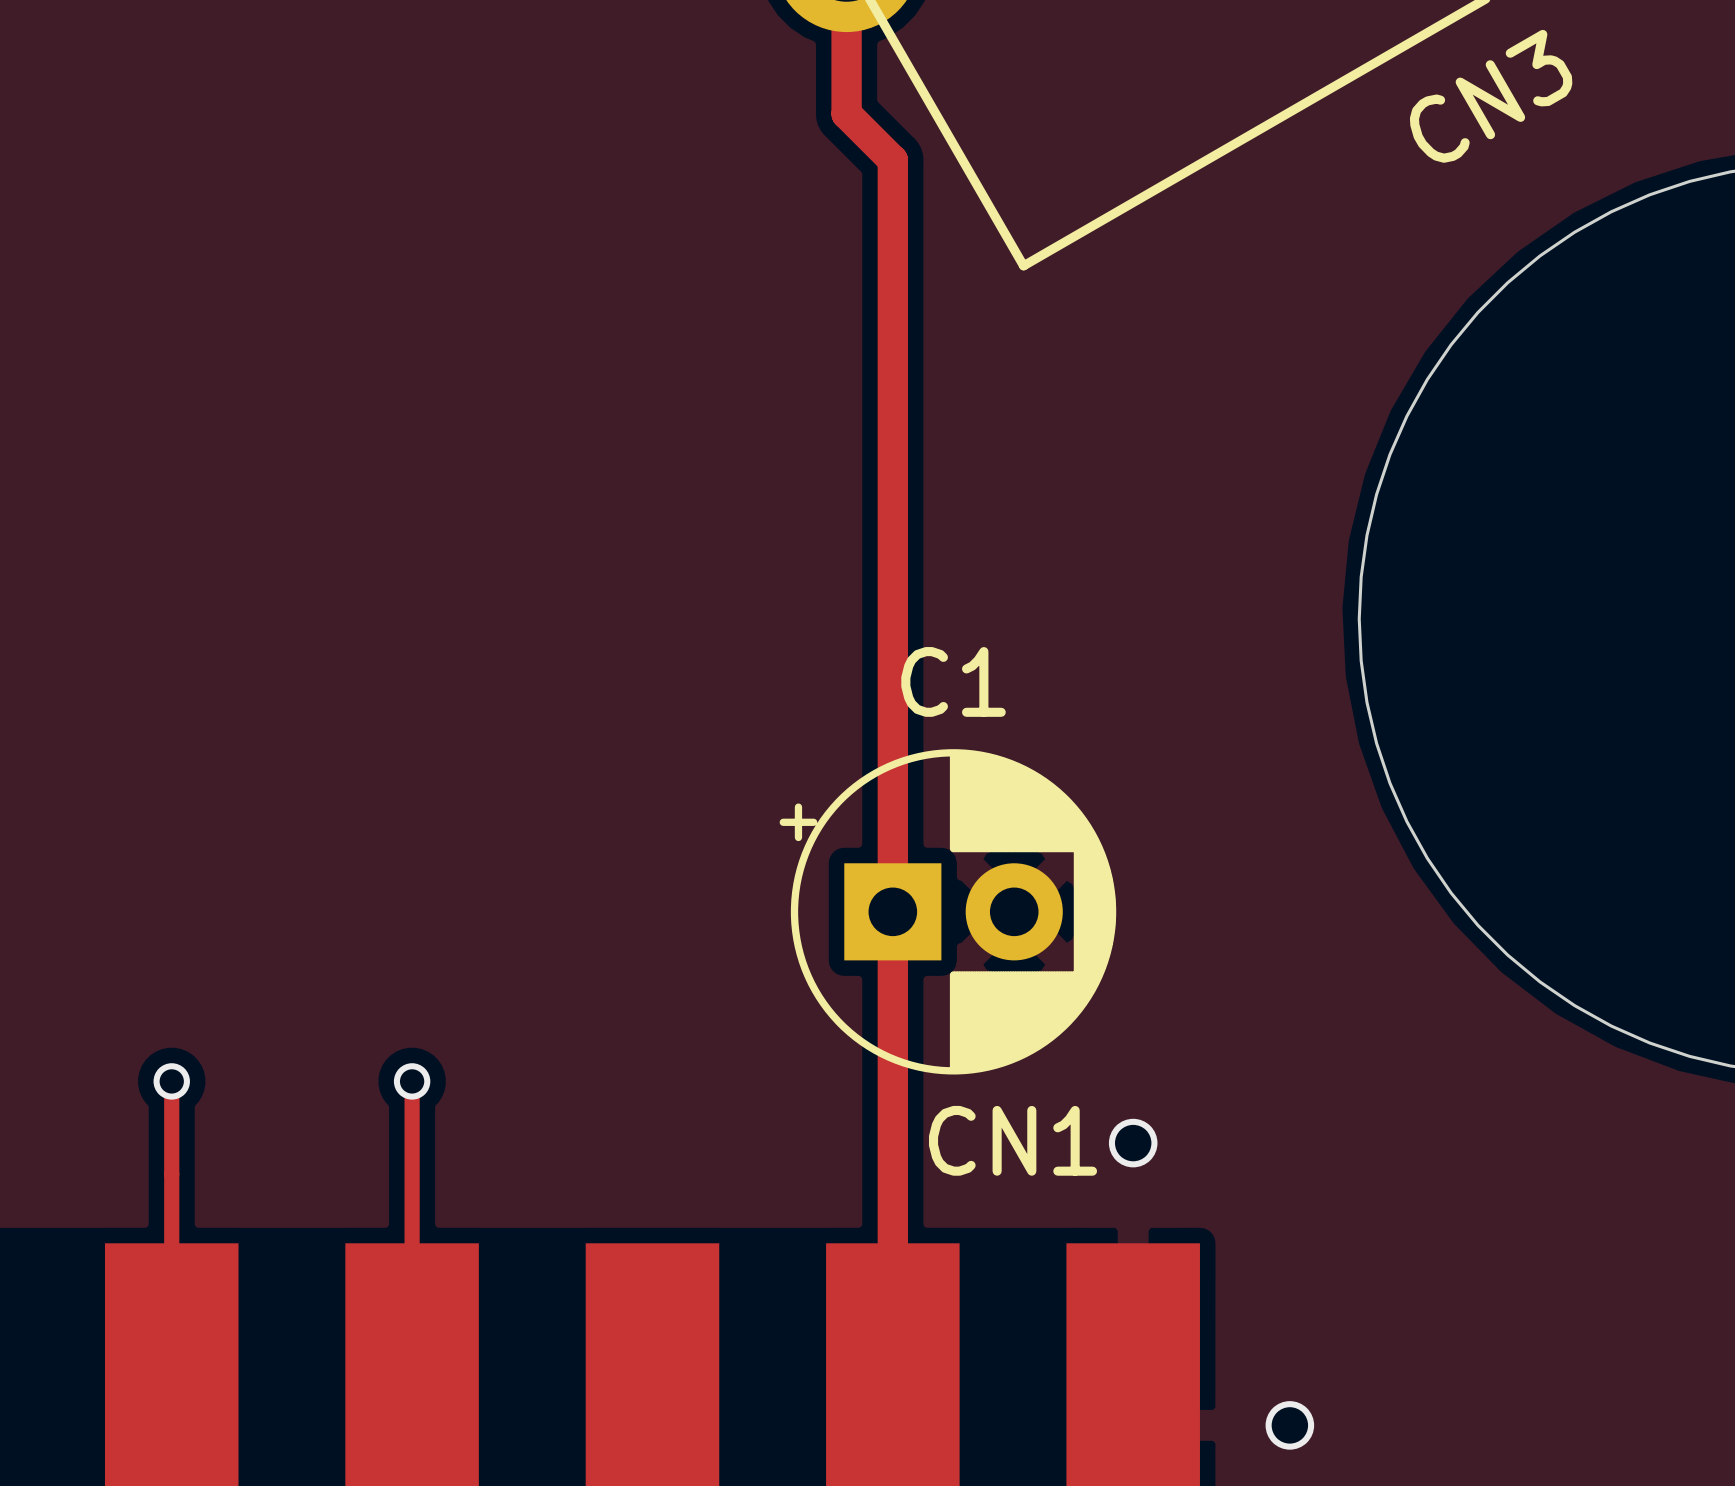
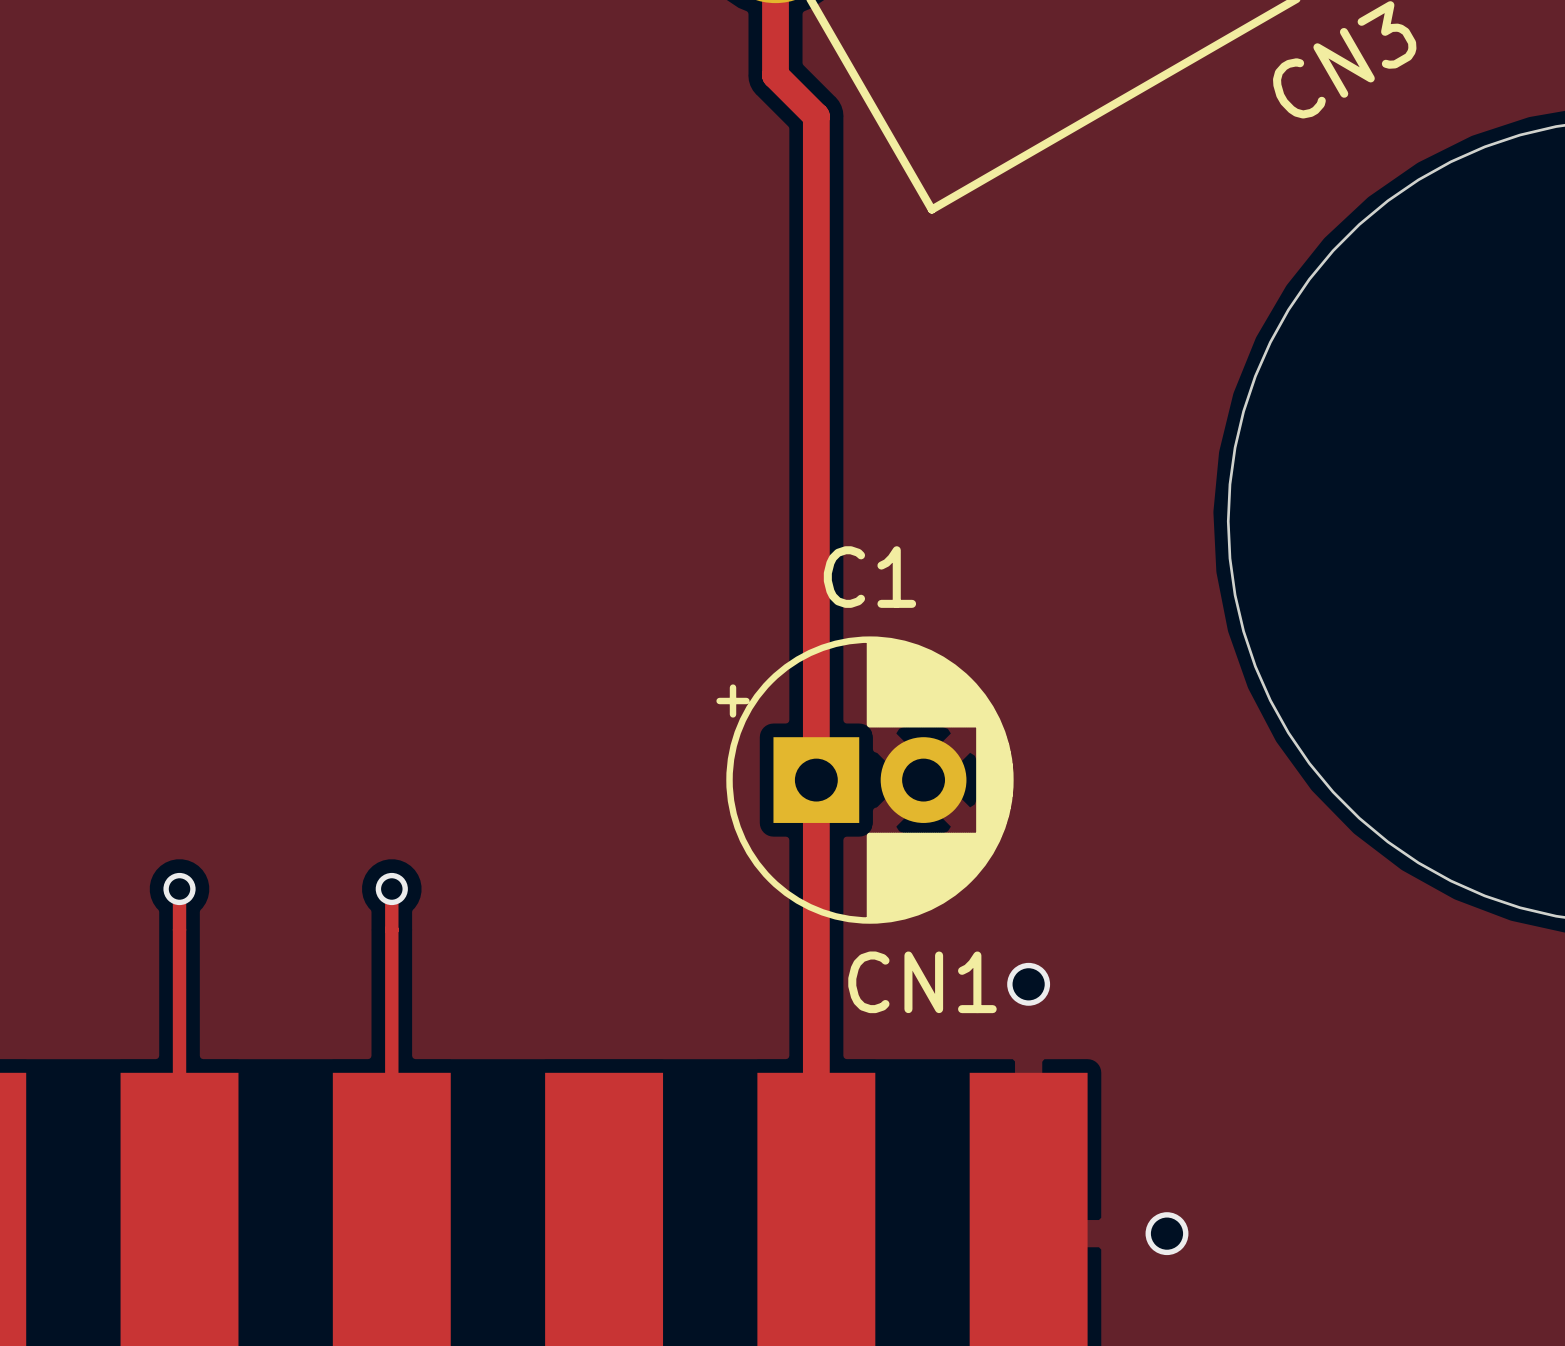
track: none -> (179, 889) (179, 929)
track: none -> (391, 889) (391, 929)
via position: (171, 1081) -> (179, 889)
via position: (412, 1081) -> (391, 889)

